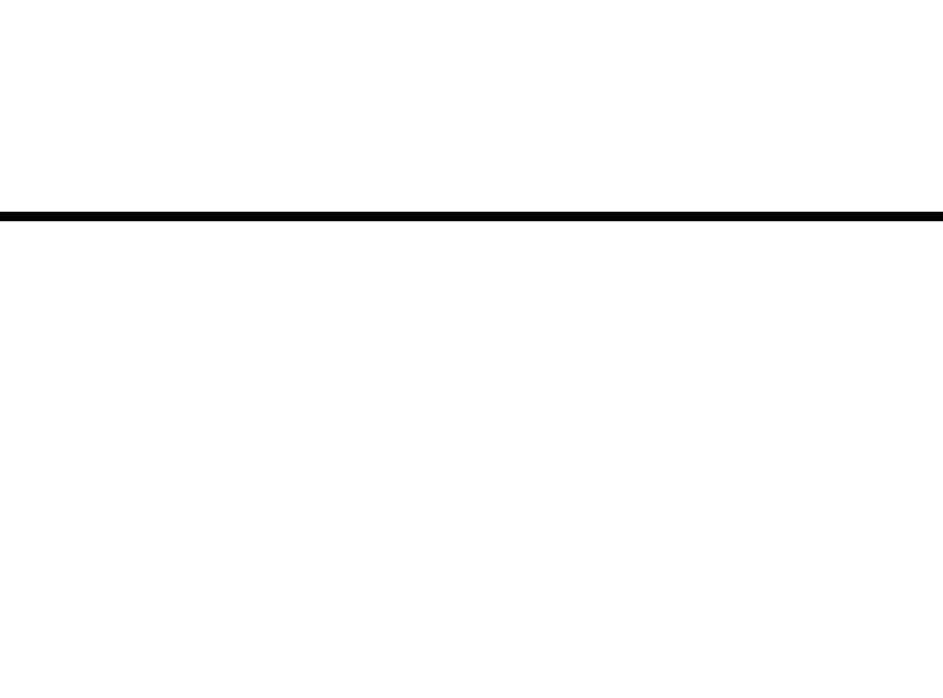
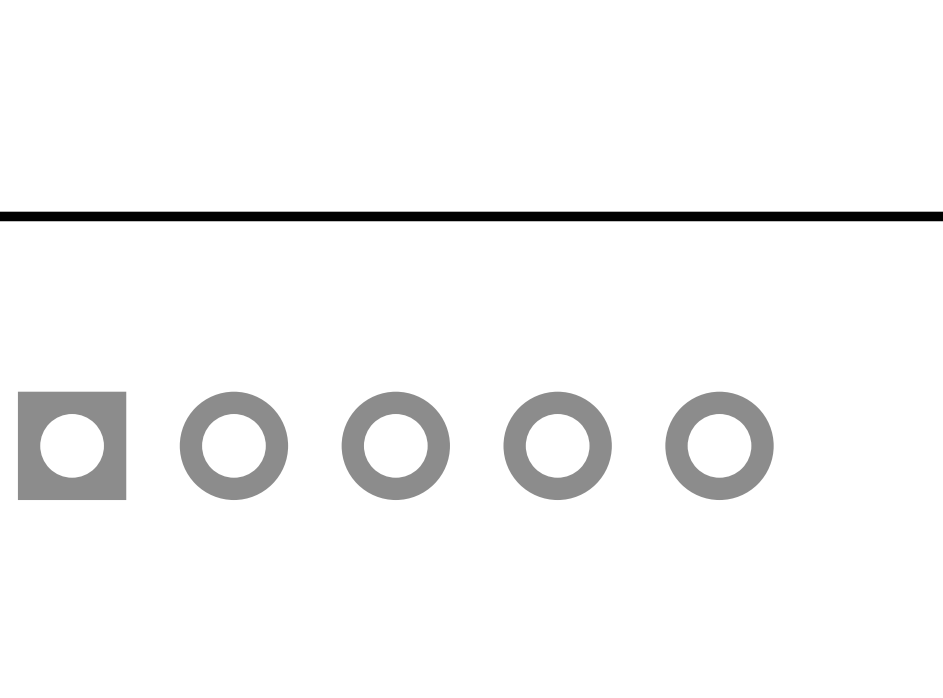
part: none -> (395, 445)

